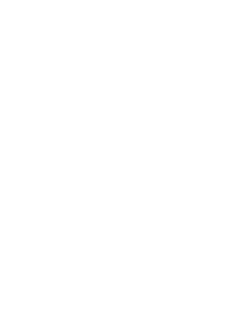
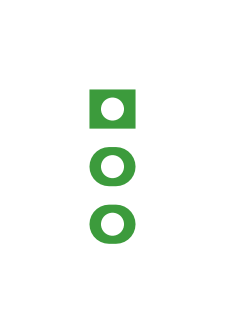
part: none -> (112, 166)

